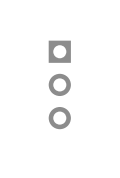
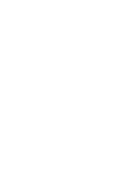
part: (59, 84) -> none

